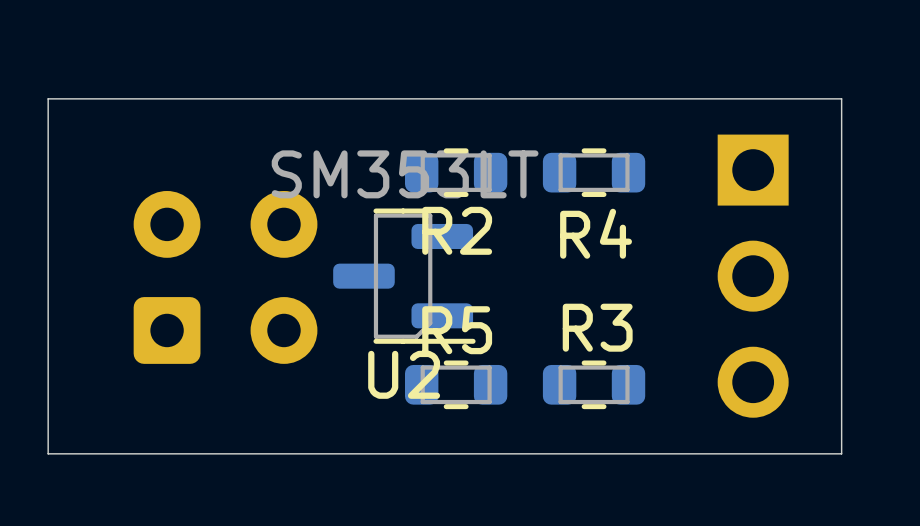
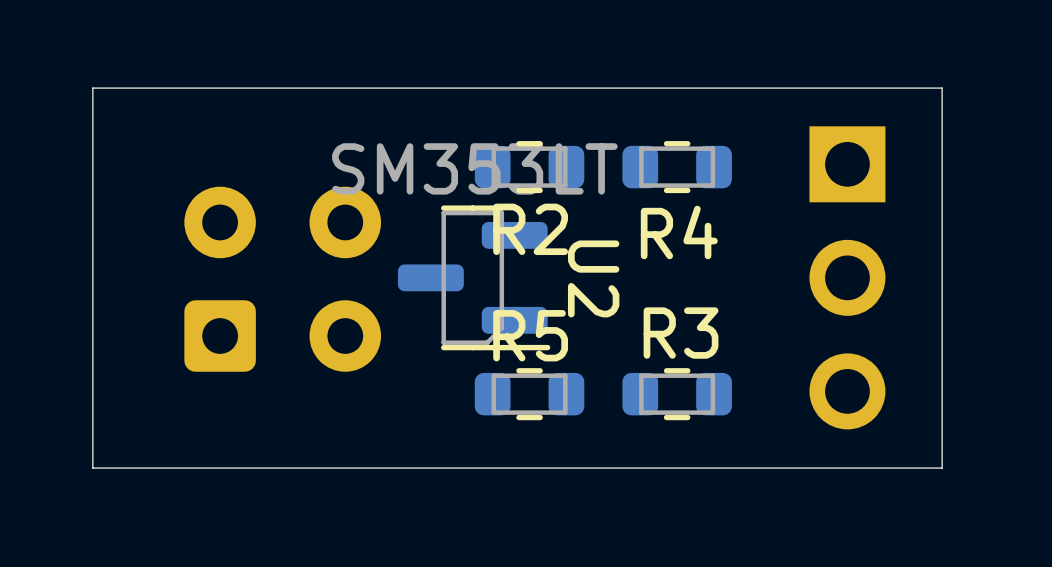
U2 name rotation: 0° (404, 374) -> 90° clockwise (593, 278)
U2 name position: U2 (404, 374) -> U2 (593, 278)

